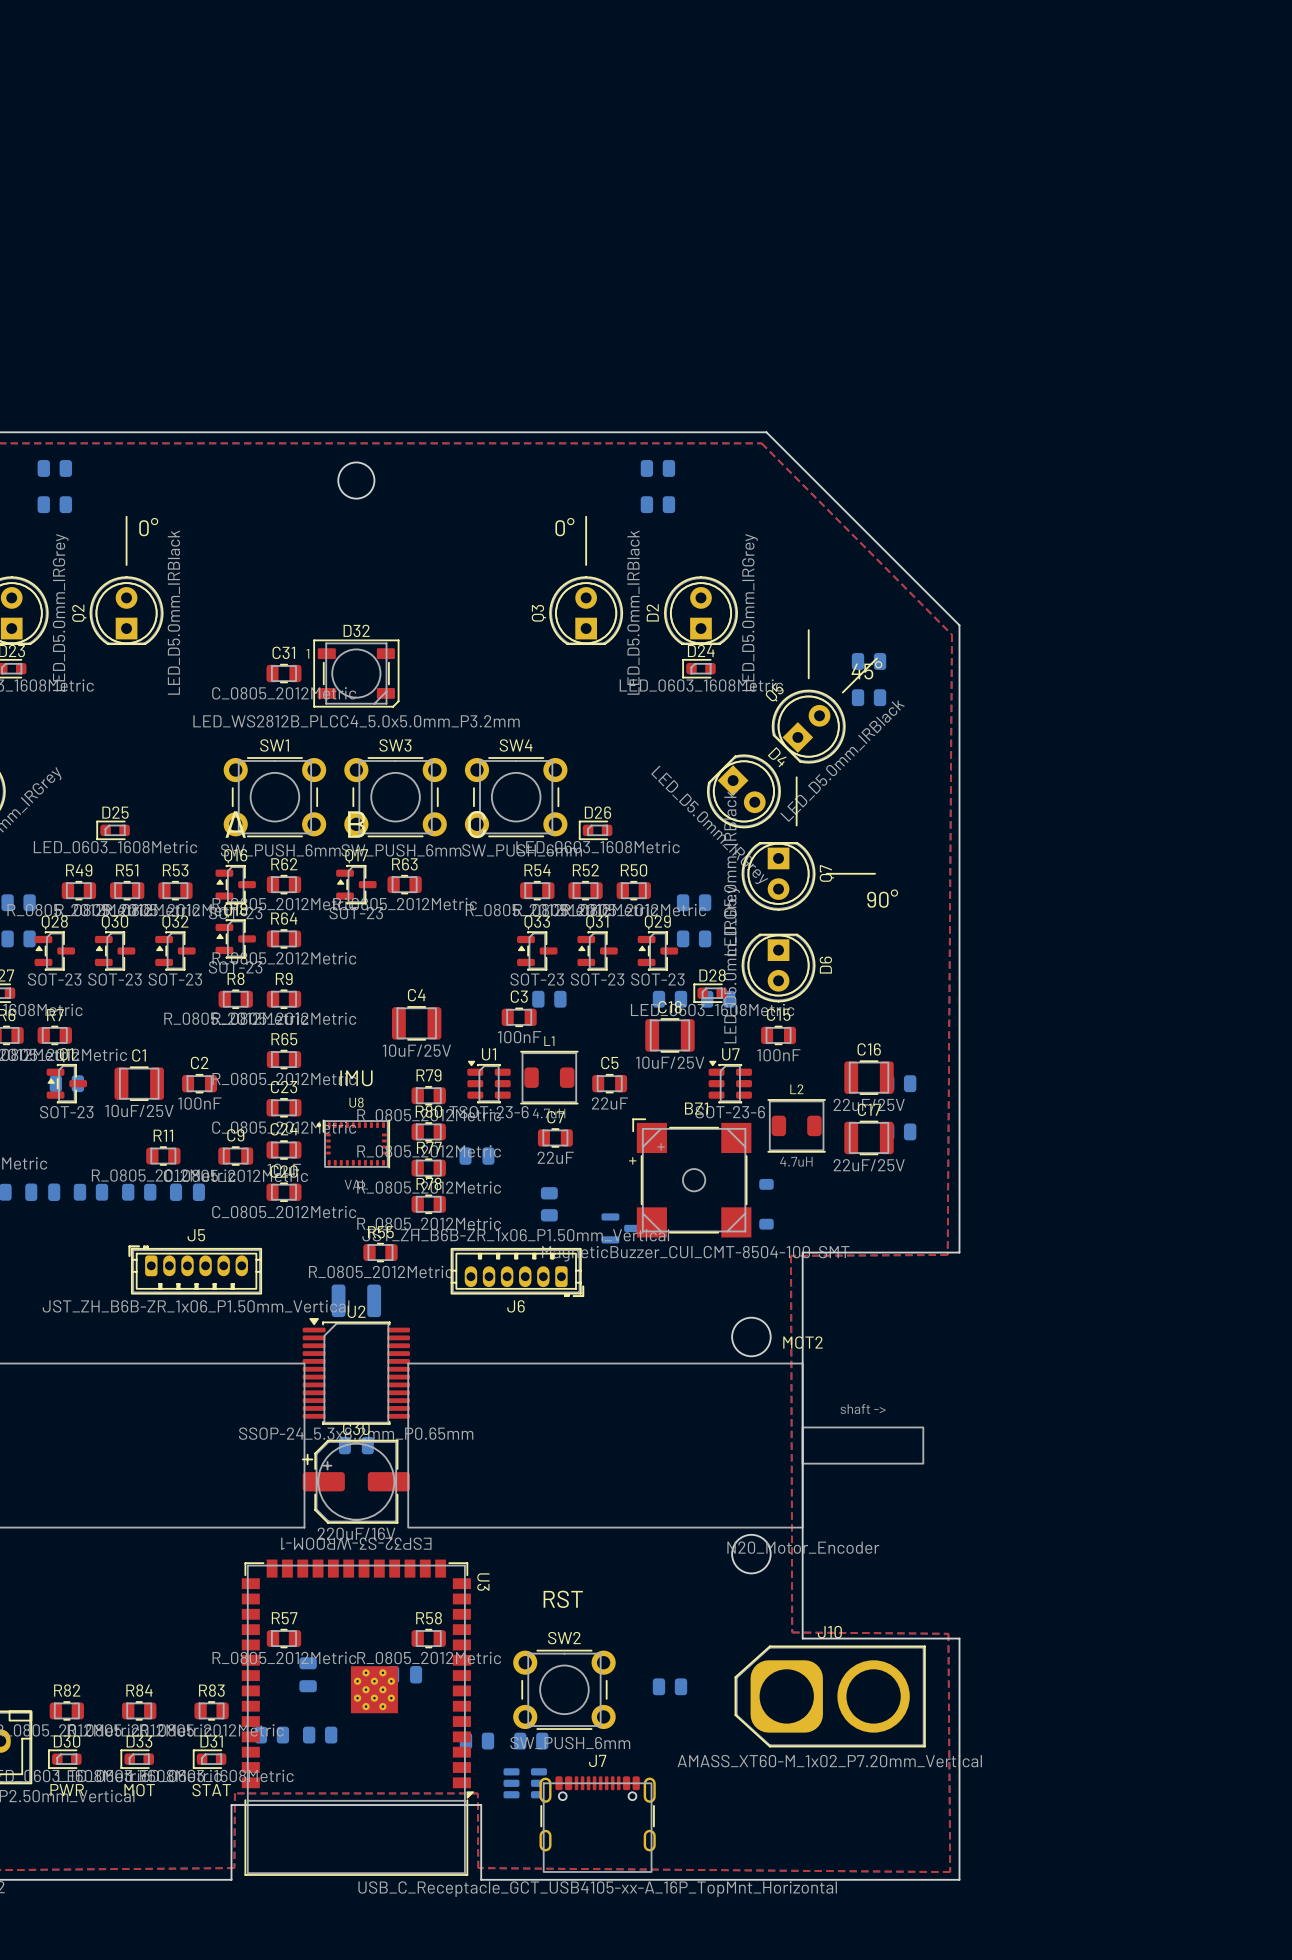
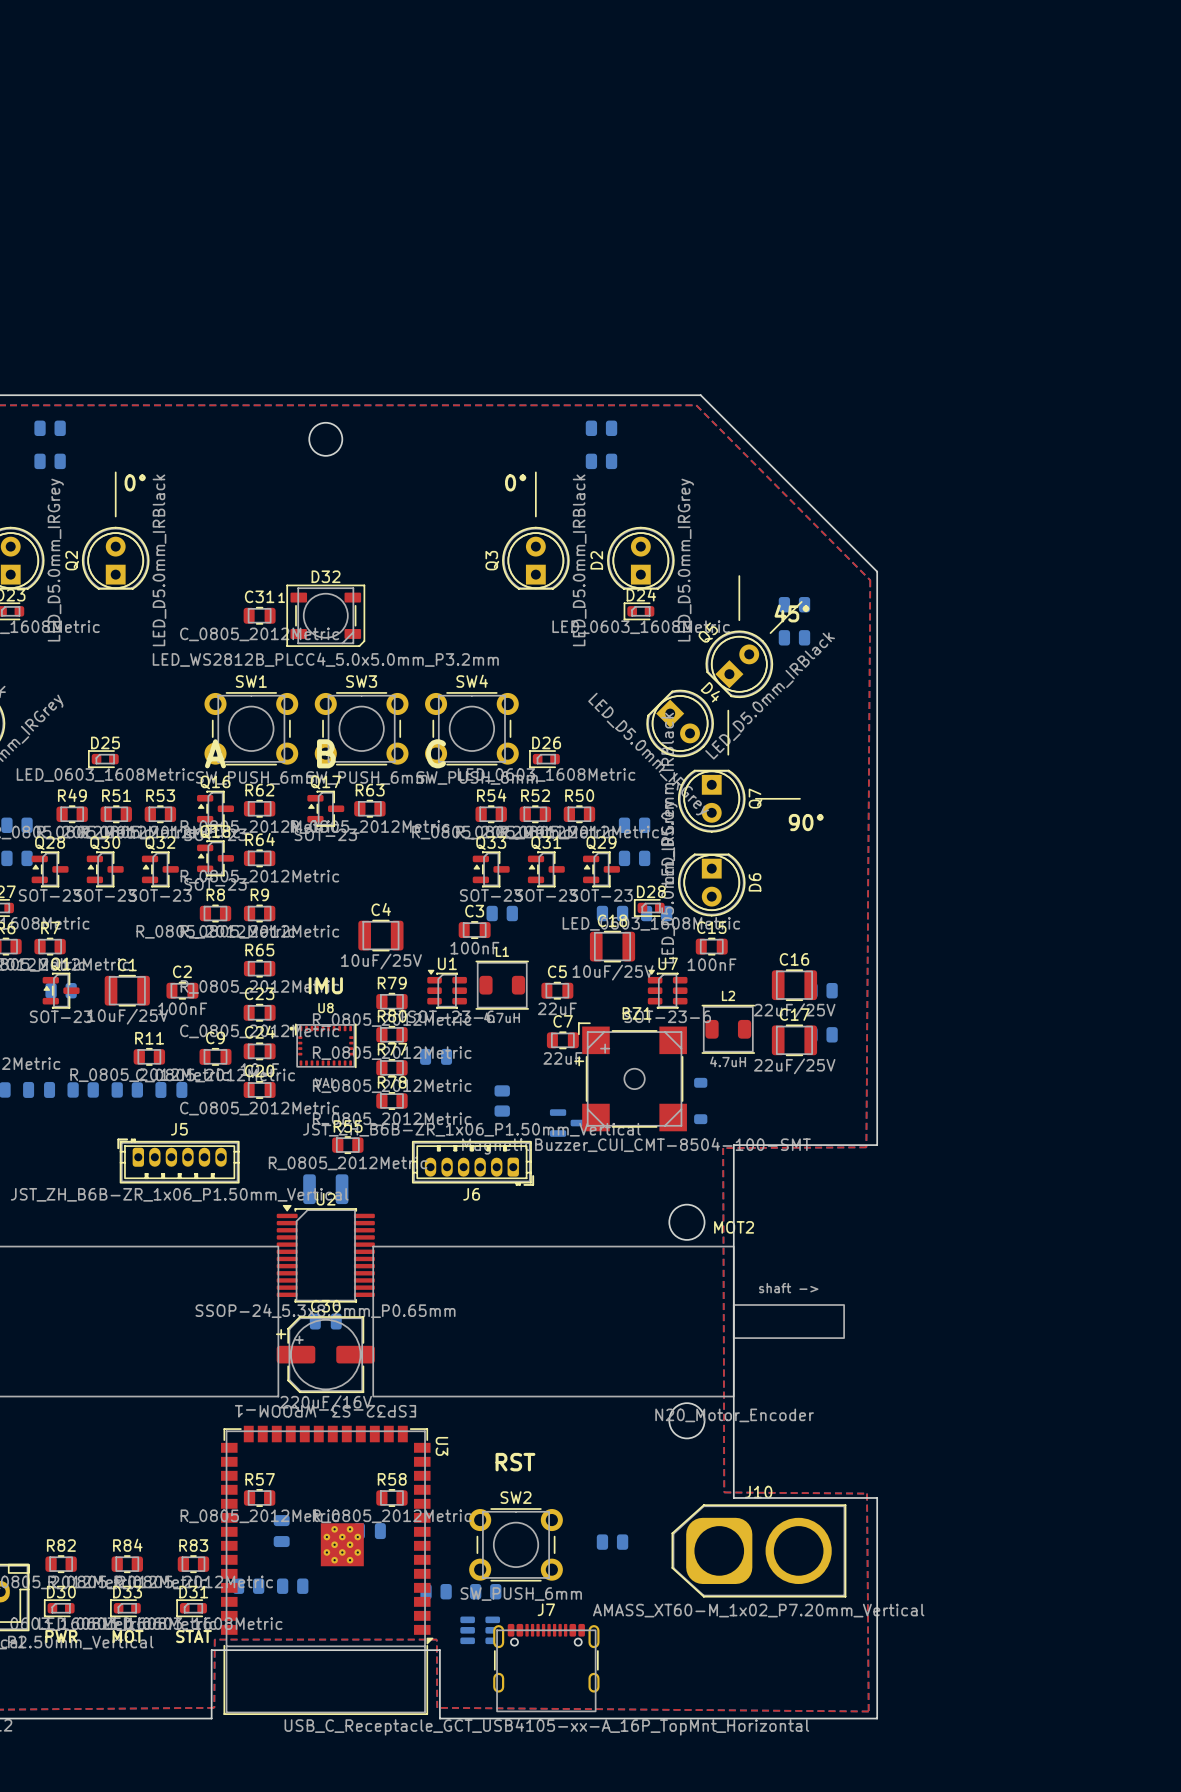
C7 position: (555, 1137) -> (562, 1040)

